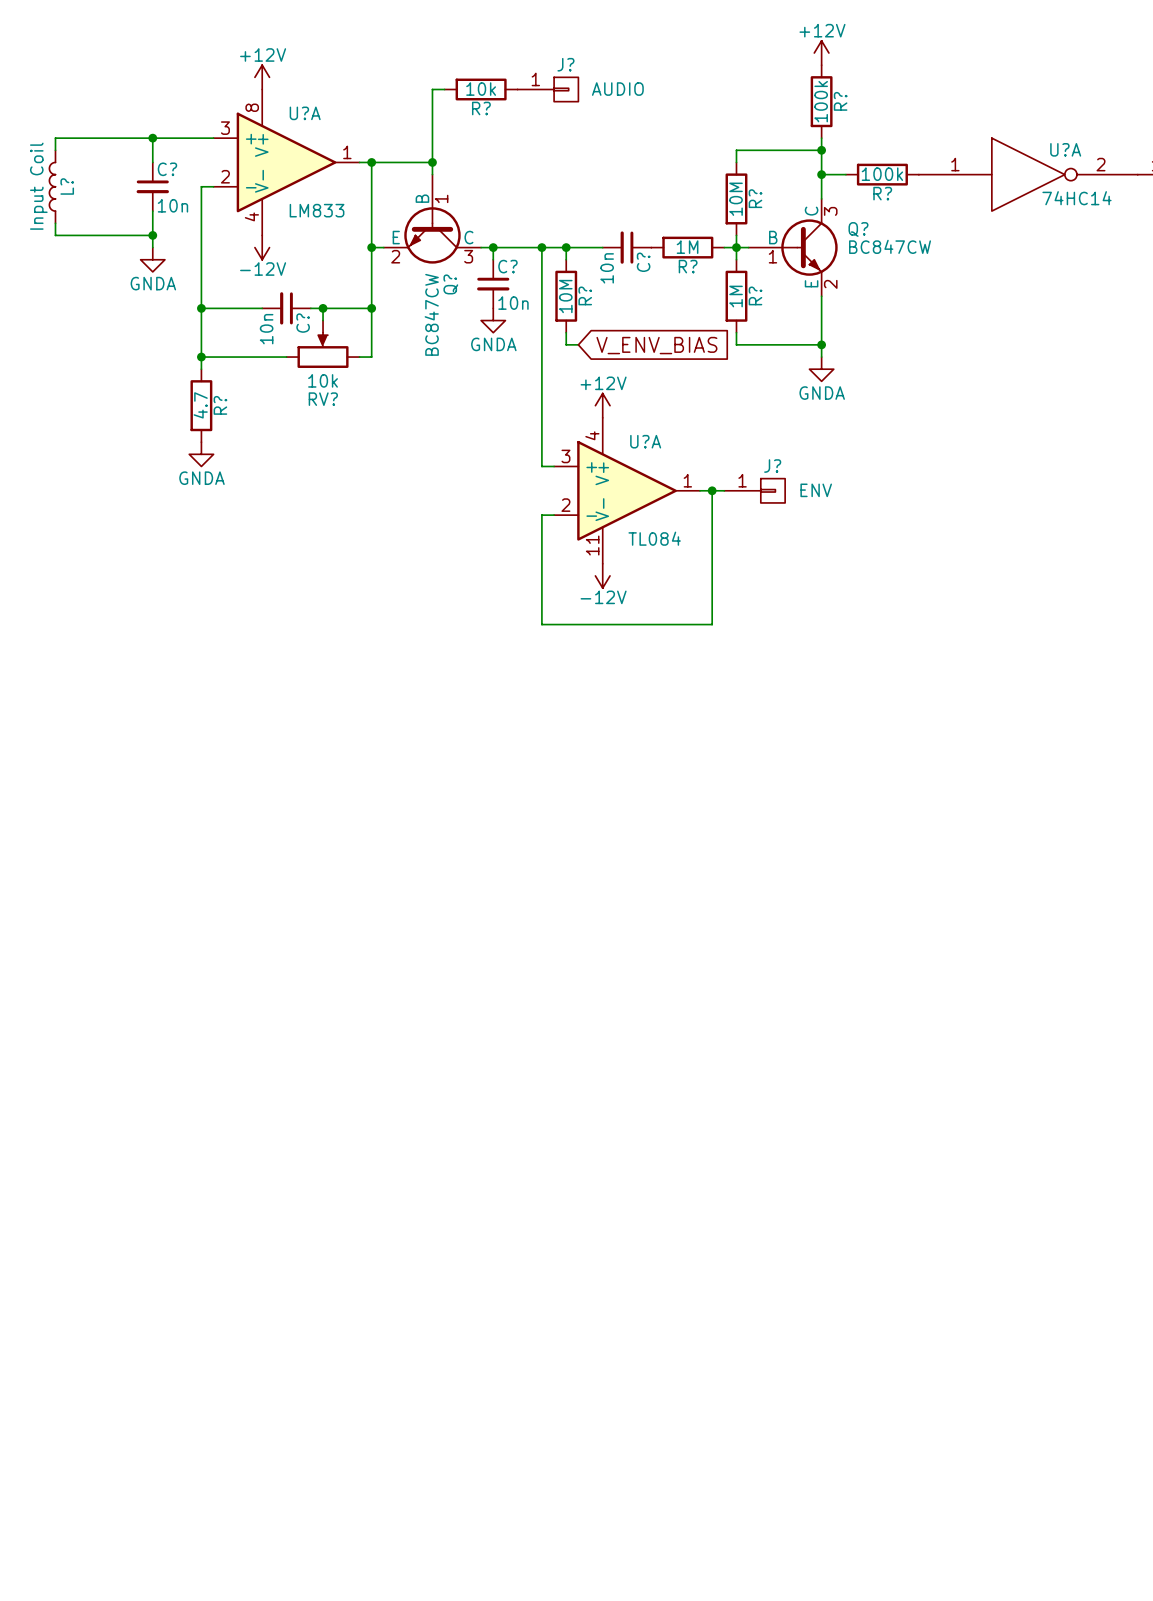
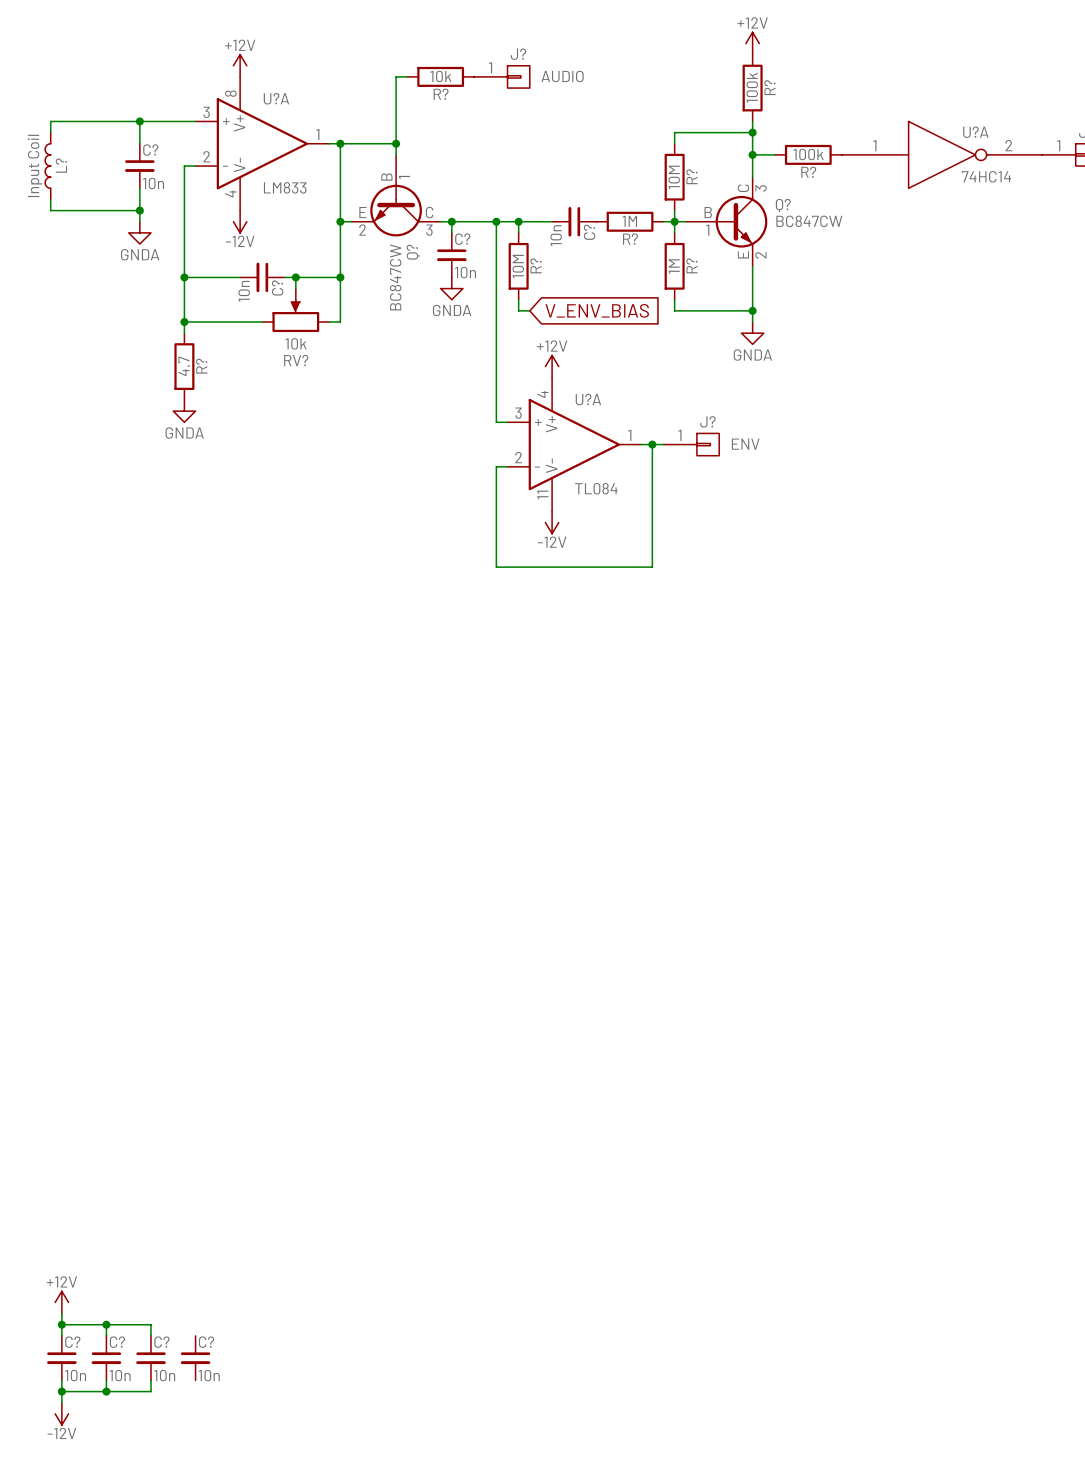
power symbol: none -> +12V (61, 1302)
wire: none -> (61, 1313) (61, 1335)
wire: none -> (61, 1324) (150, 1324) (150, 1335)
junction: none -> (61, 1324)
wire: none -> (106, 1324) (106, 1335)
junction: none -> (106, 1324)
C?: none -> 10n (61, 1358)
C?: none -> 10n (106, 1358)
C?: none -> 10n (150, 1358)
C?: none -> 10n (195, 1358)
wire: none -> (61, 1380) (61, 1402)
wire: none -> (106, 1380) (106, 1391)
wire: none -> (150, 1380) (150, 1391) (61, 1391)
junction: none -> (61, 1391)
junction: none -> (106, 1391)
power symbol: none -> -12V (61, 1413)

